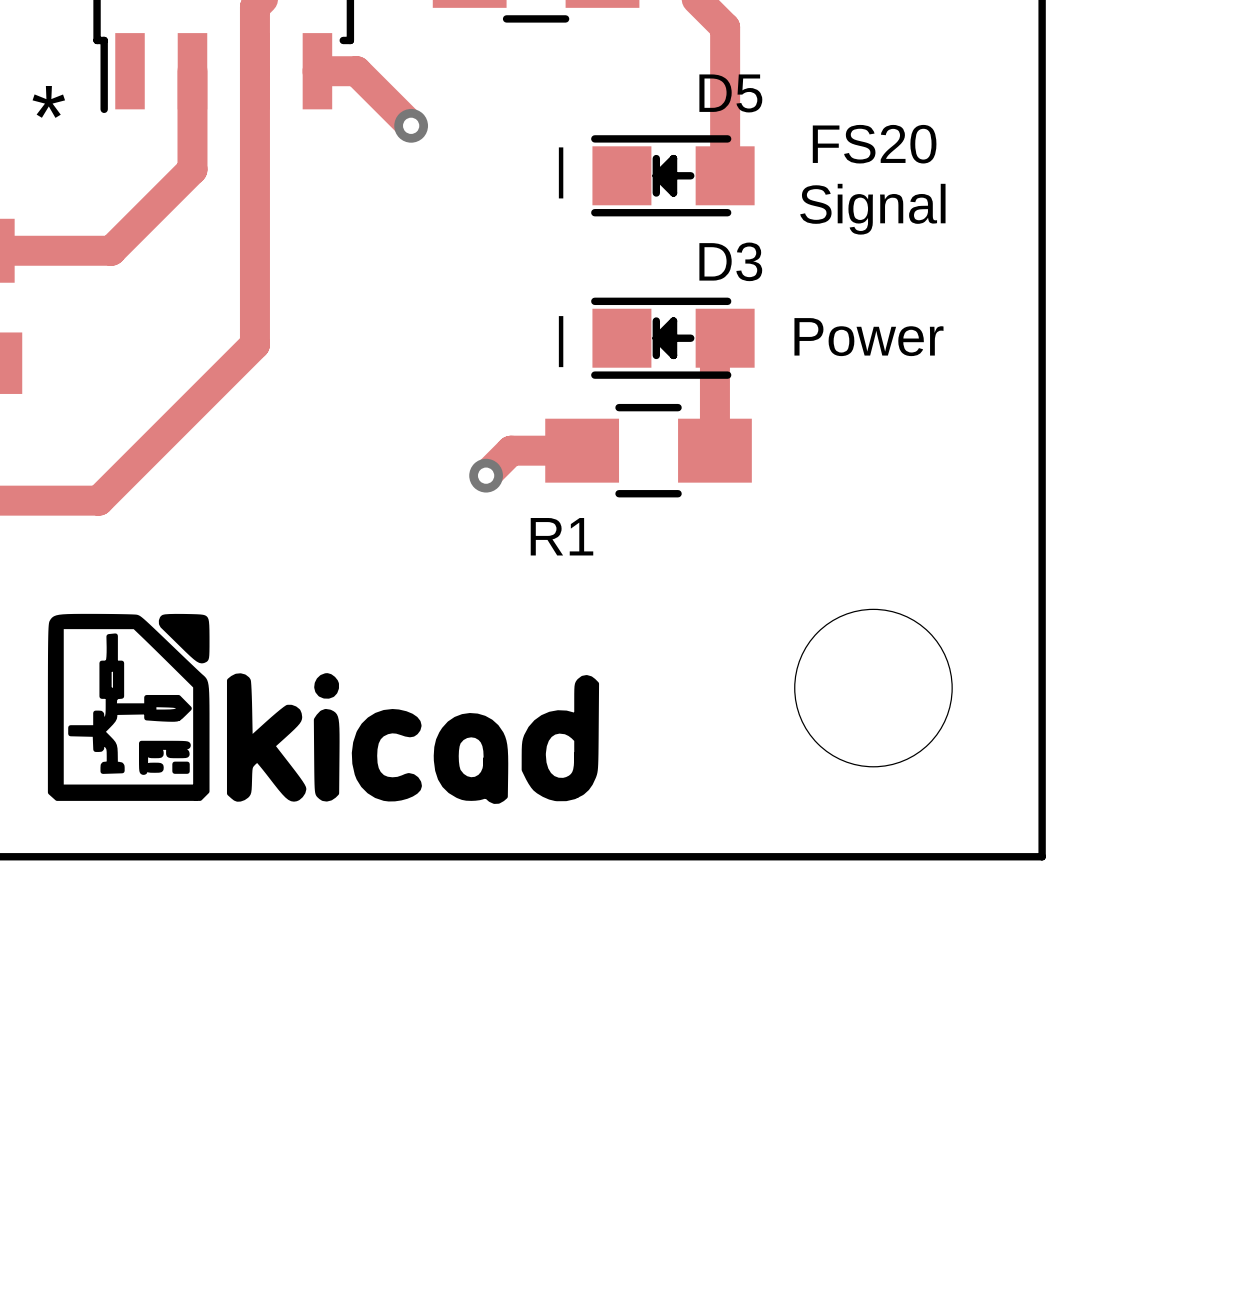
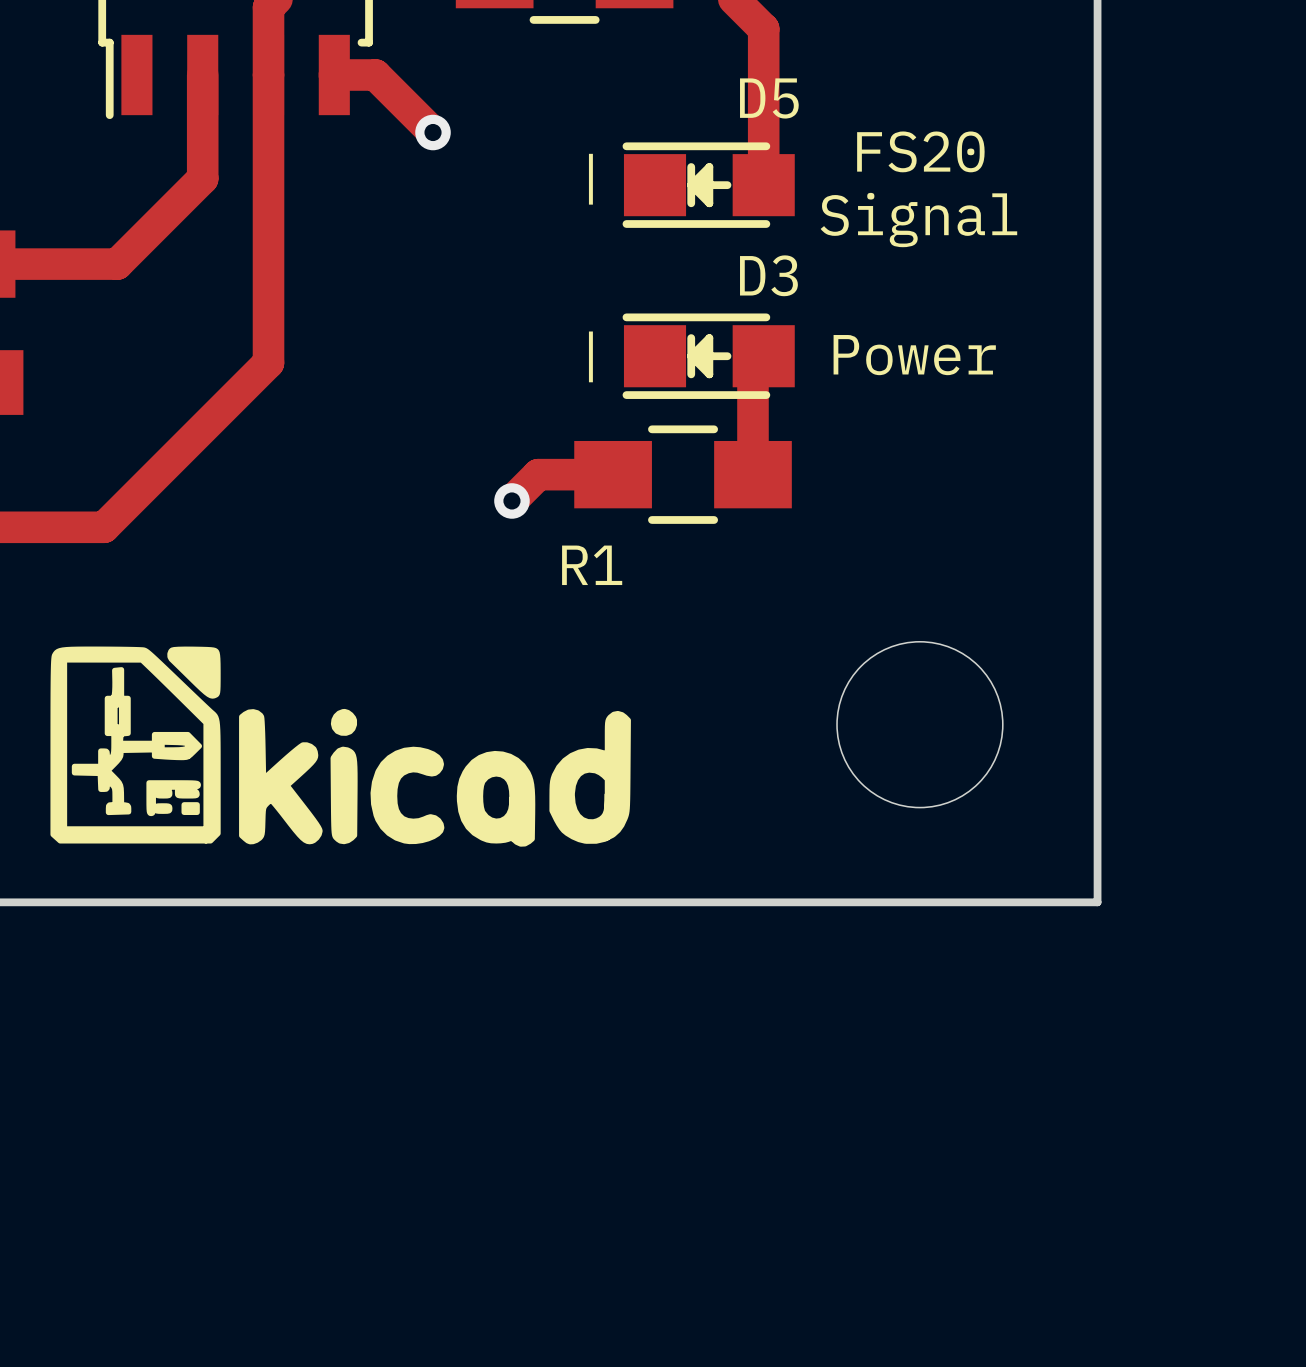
text: * (48, 101) -> none

